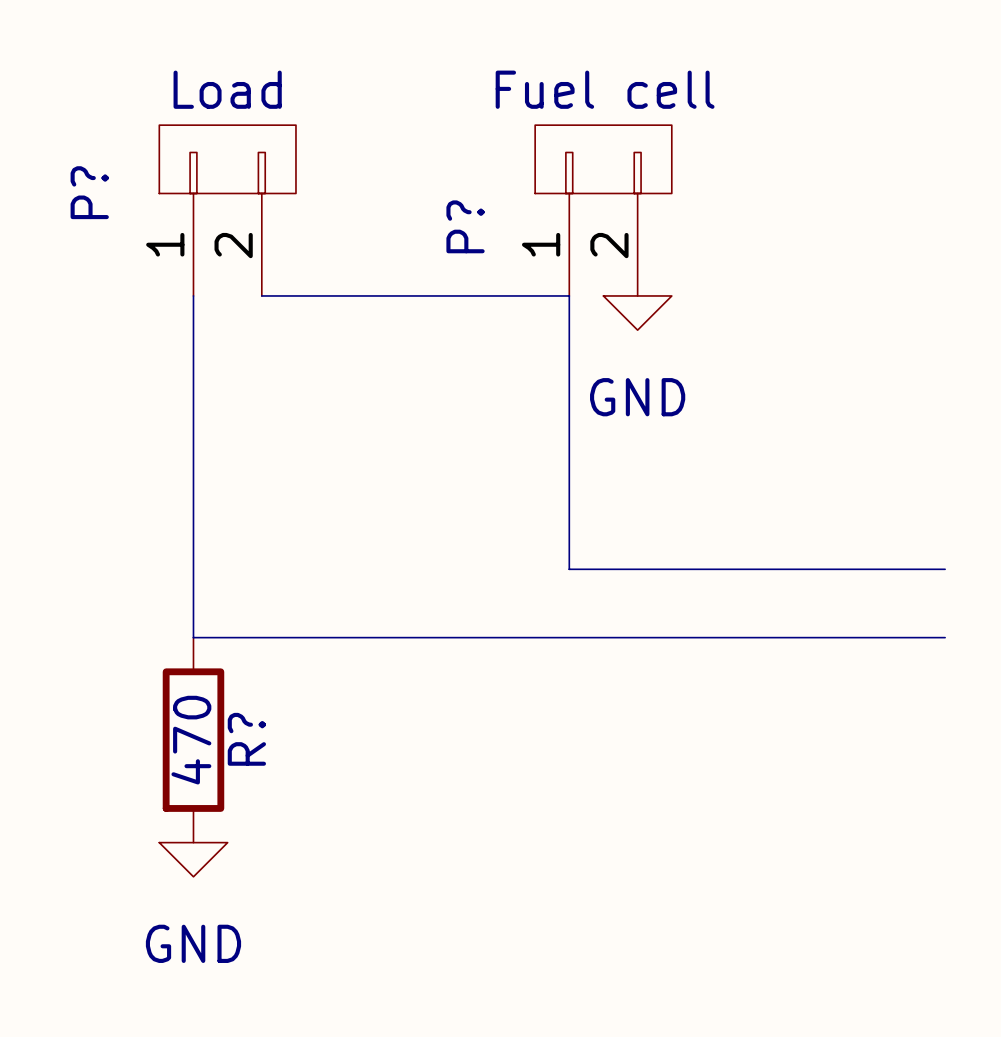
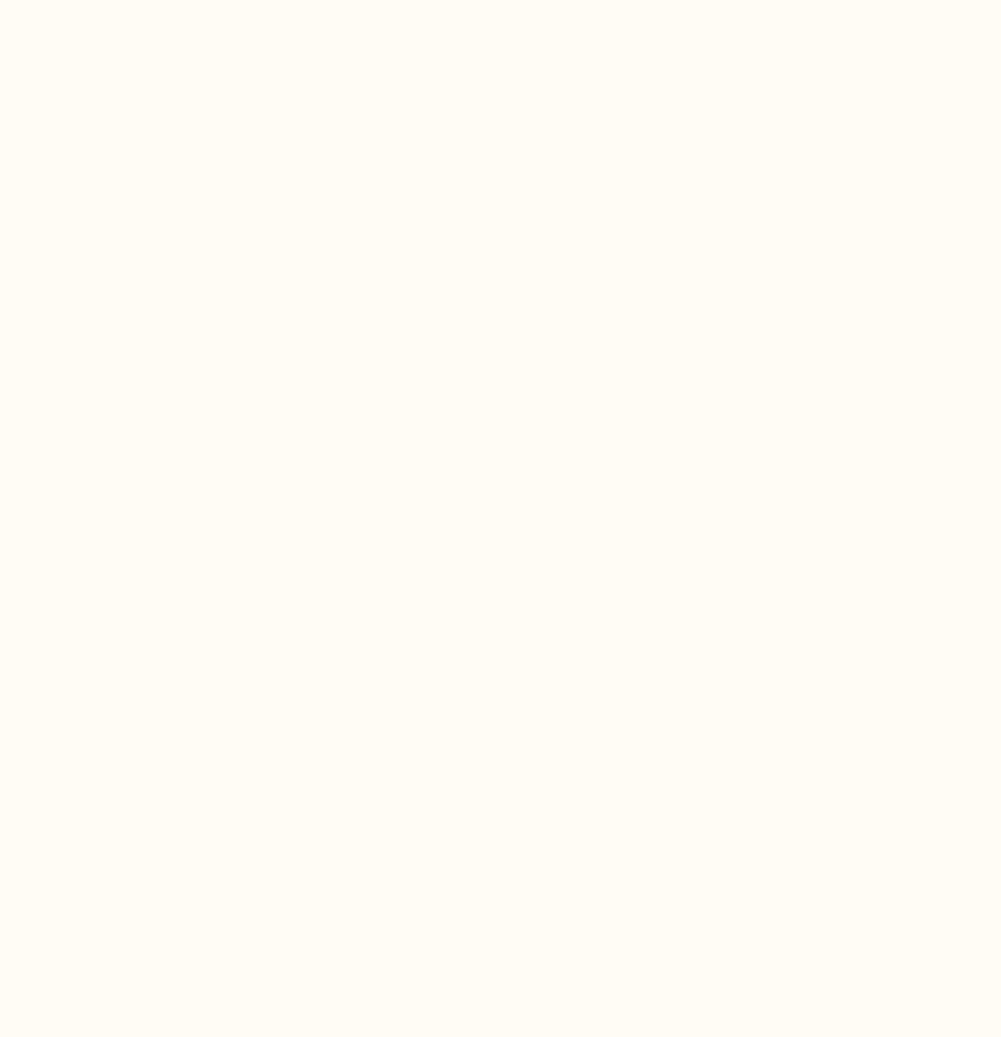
P?: Load (227, 210) -> none
P?: Fuel cell (603, 210) -> none
wire: (193, 295) (193, 637) (945, 637) -> none
wire: (261, 295) (569, 295) (569, 569) (945, 569) -> none
power symbol: GND (637, 313) -> none
R?: 470 (193, 740) -> none
power symbol: GND (193, 859) -> none

